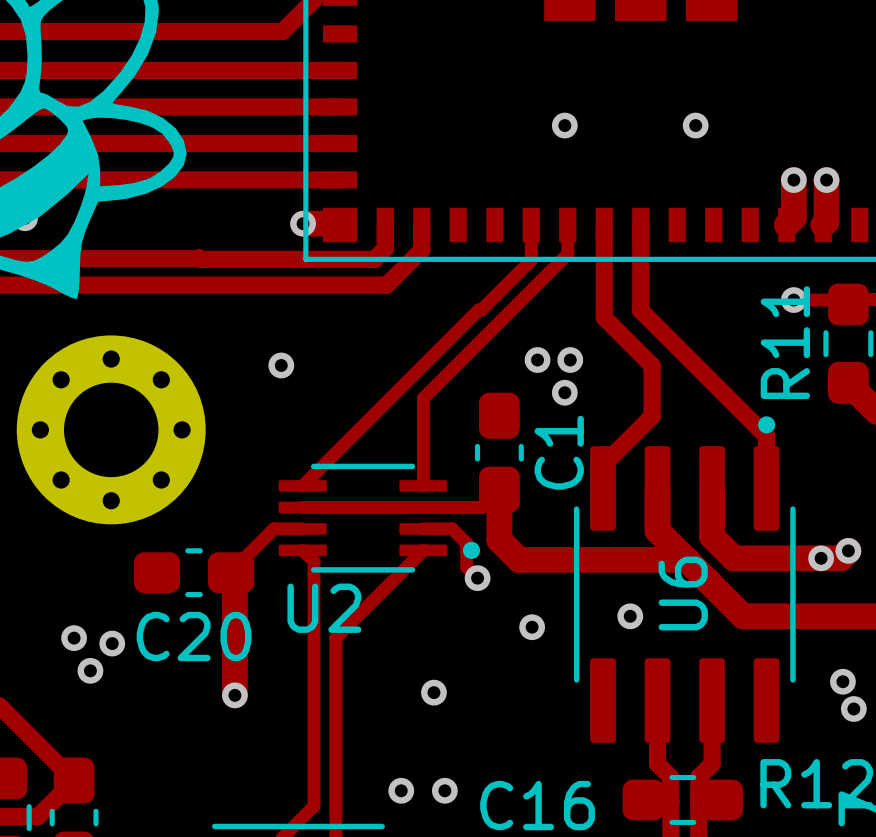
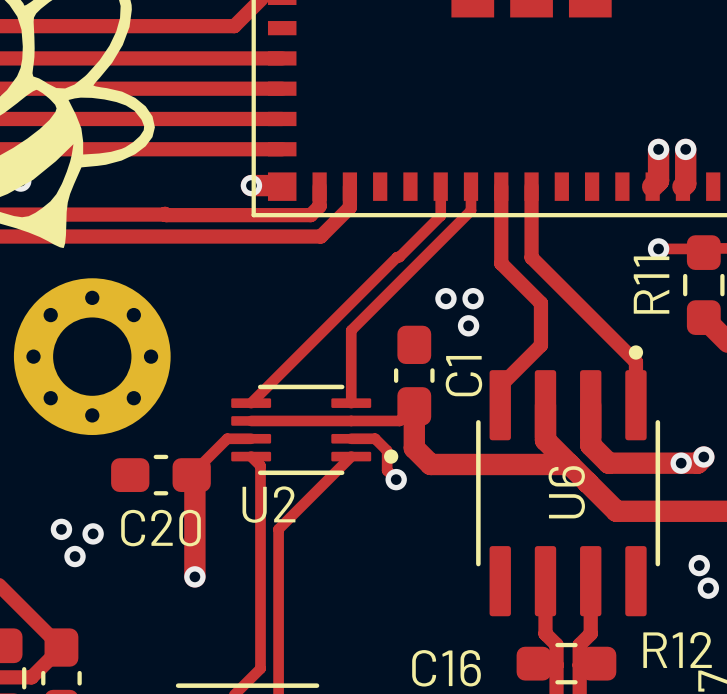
via: (564, 125) -> none
via: (695, 125) -> none
via: (281, 365) -> none
via: (630, 616) -> none
via: (532, 627) -> none
via: (433, 692) -> none
via: (401, 790) -> none
via: (444, 790) -> none

